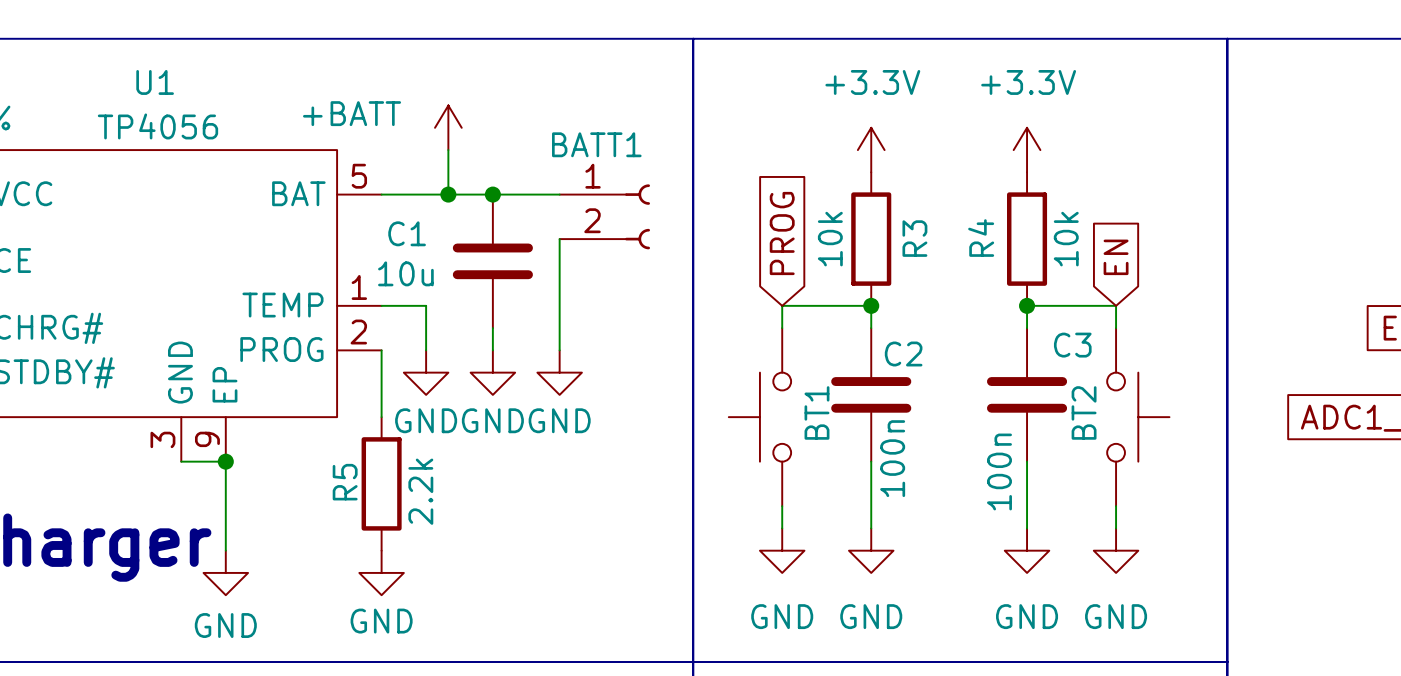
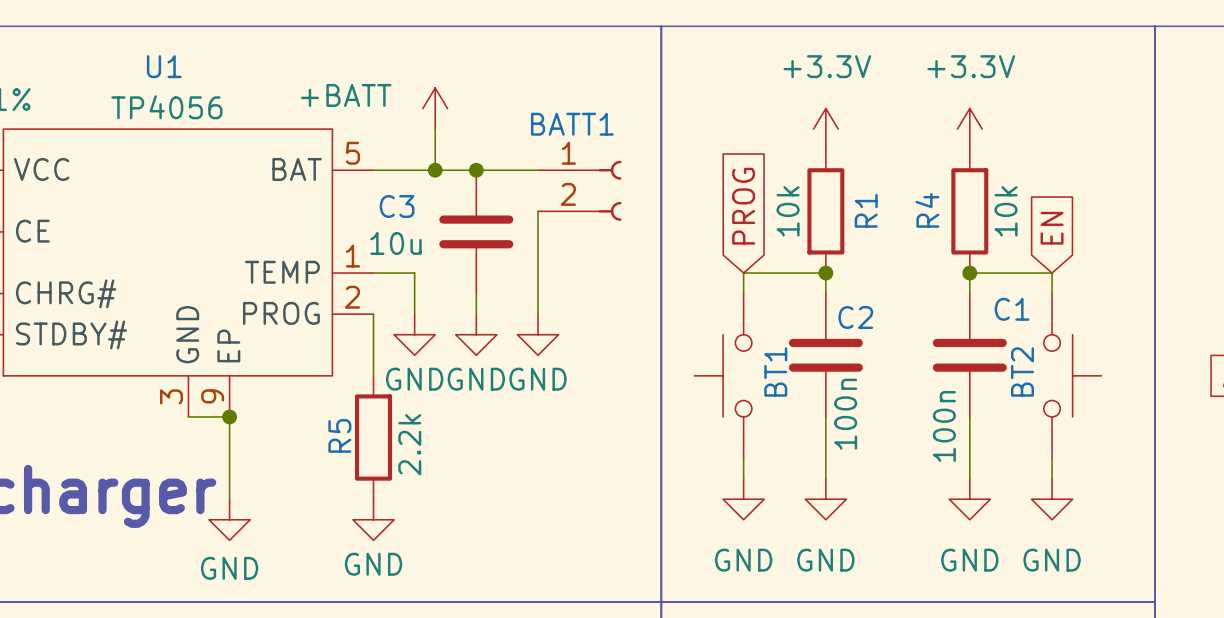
C1 name: C1 (407, 233) -> C3 (397, 206)
R3 name: R3 (914, 238) -> R1 (866, 210)
C3 name: C3 (1072, 345) -> C1 (1012, 309)

